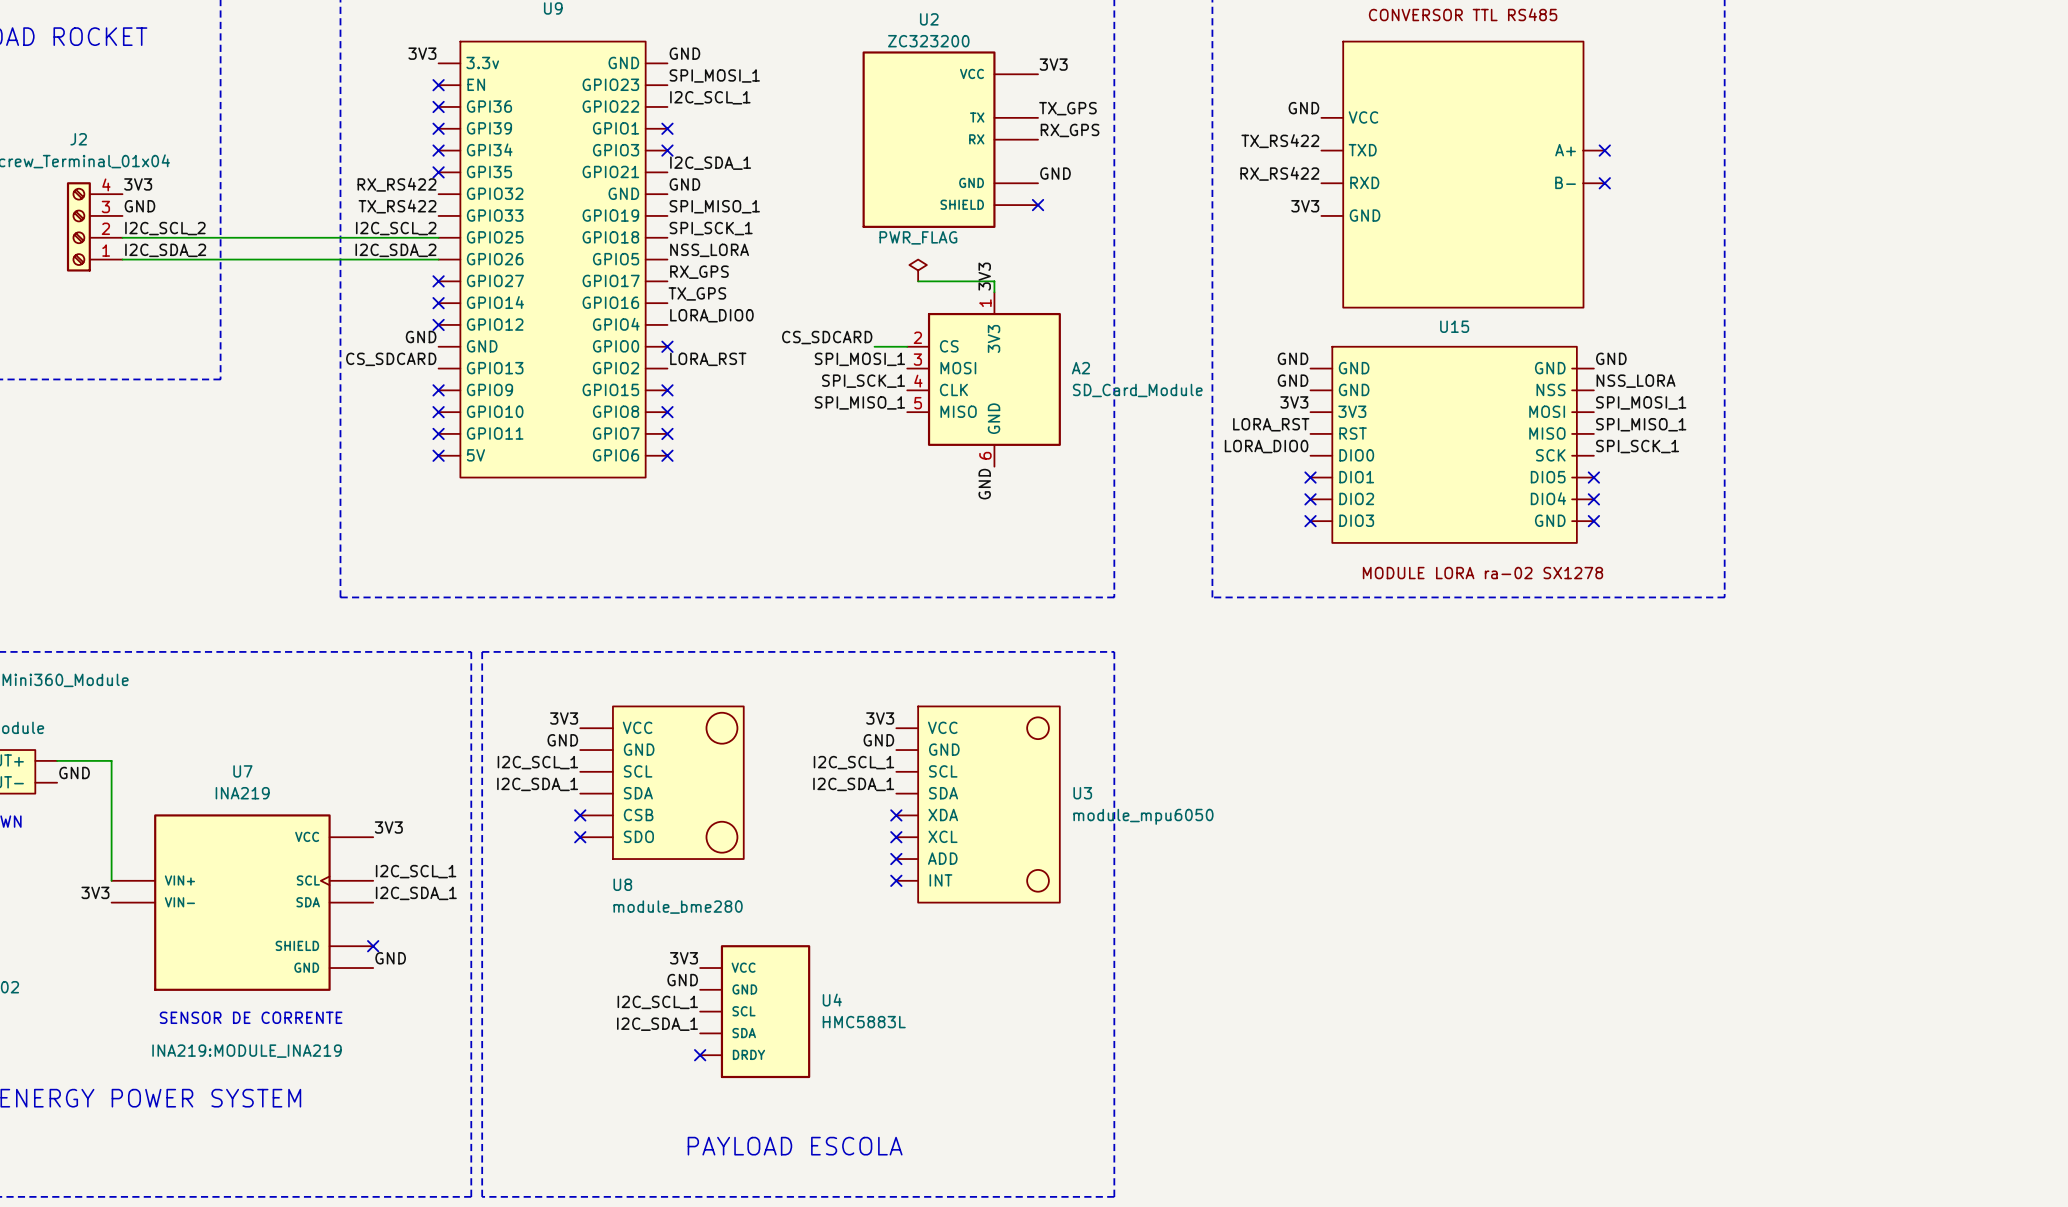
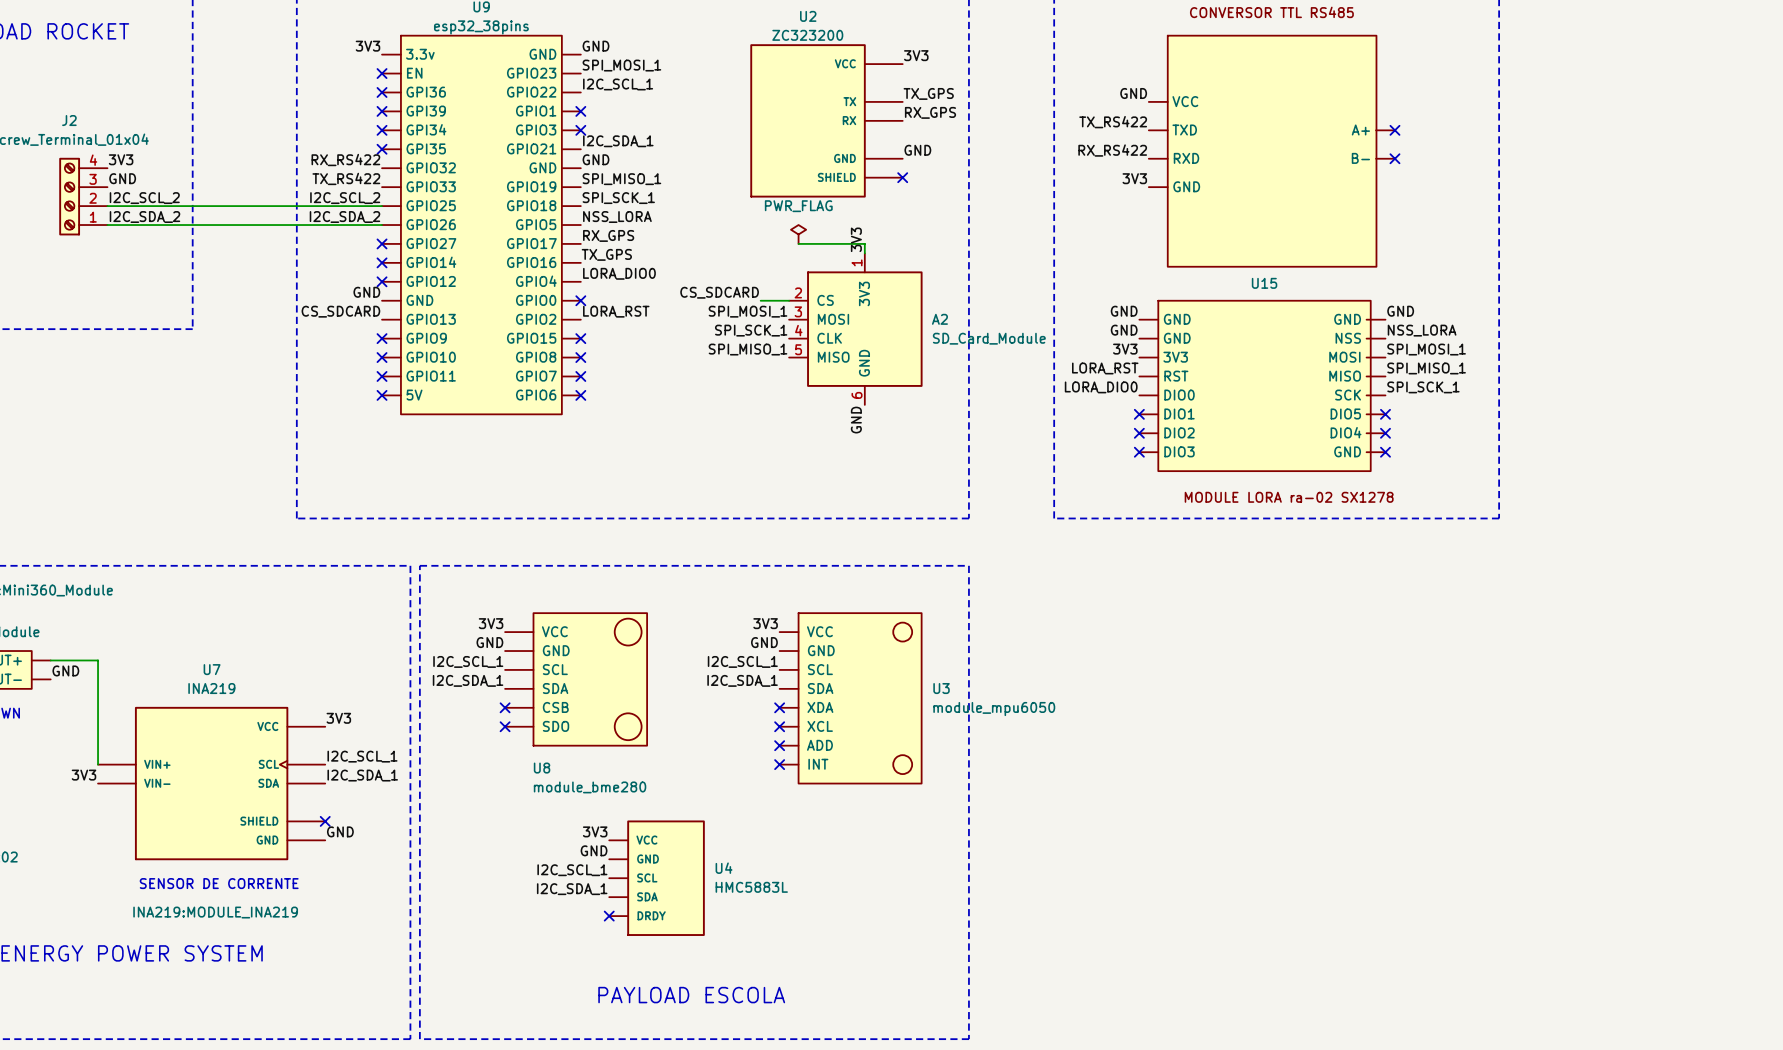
U9 value: none -> esp32_38pins (481, 27)

